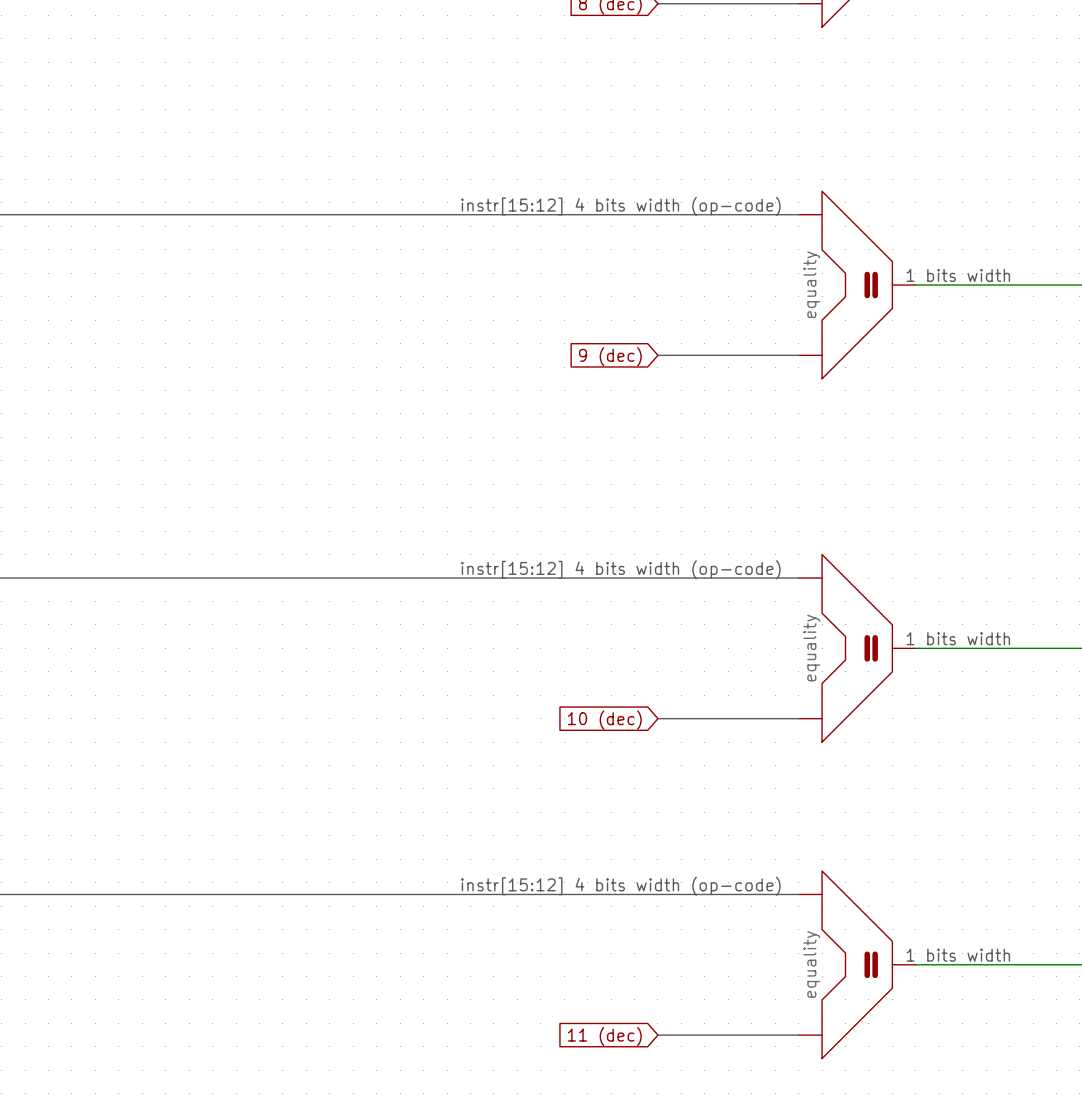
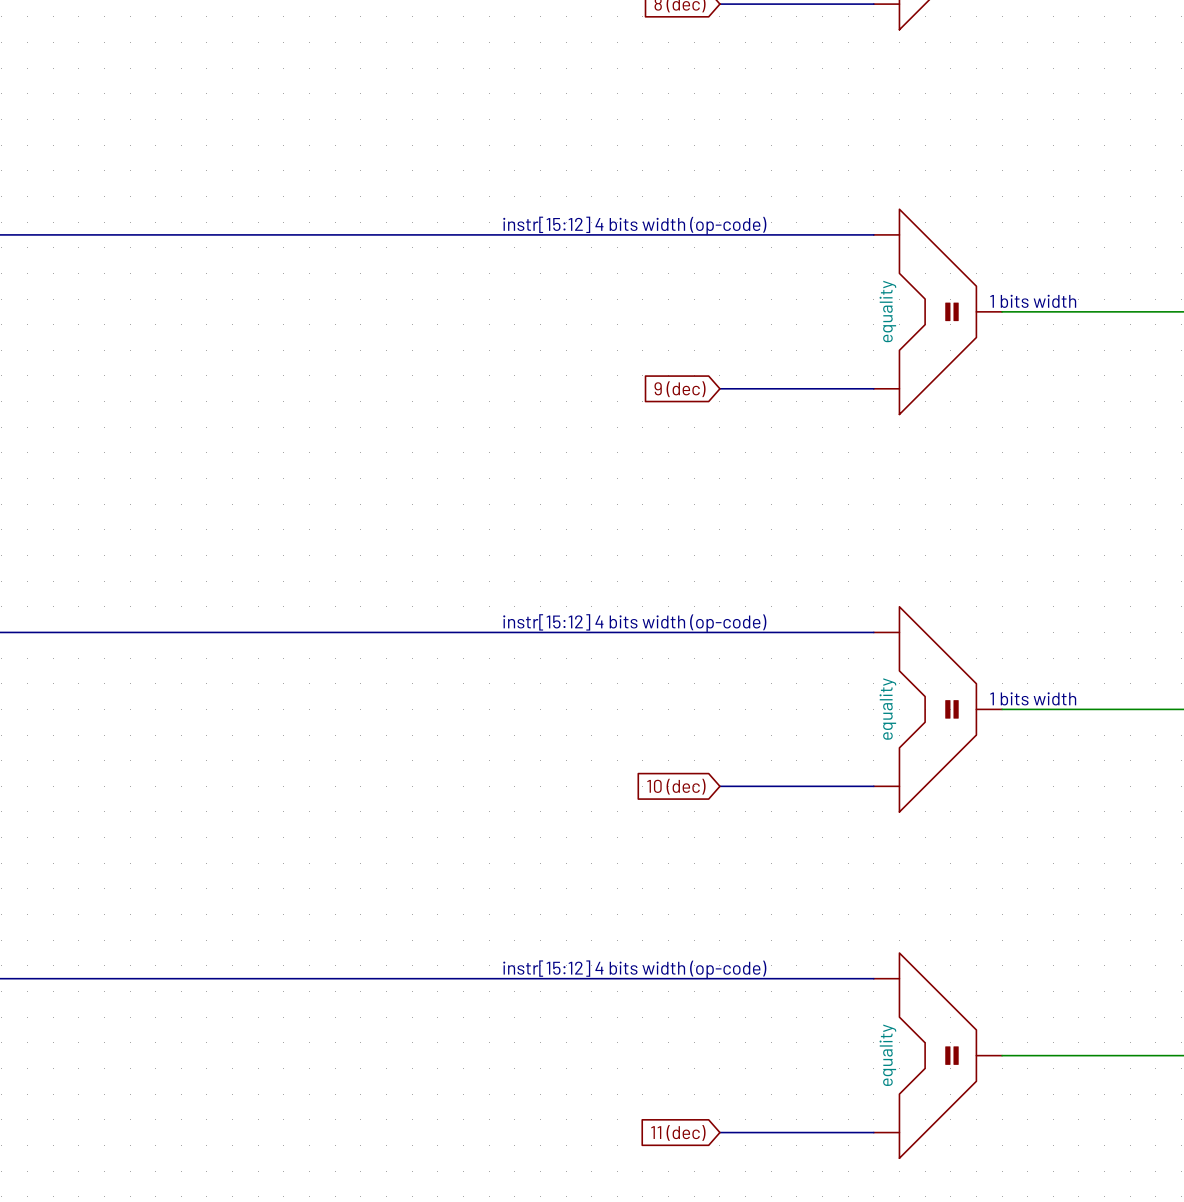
text: 1 bits width (958, 955) -> none

